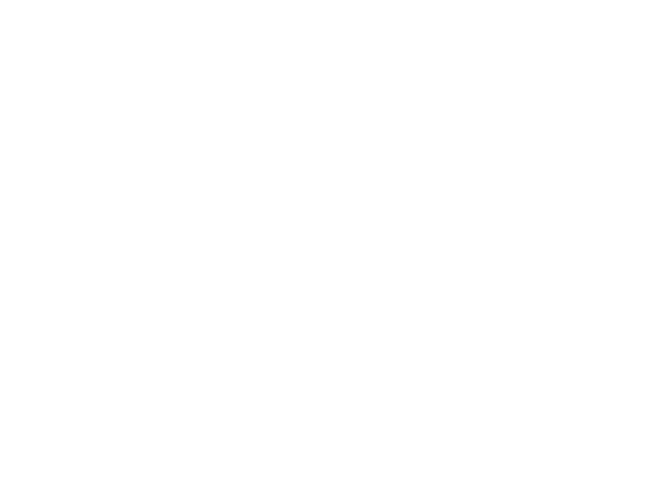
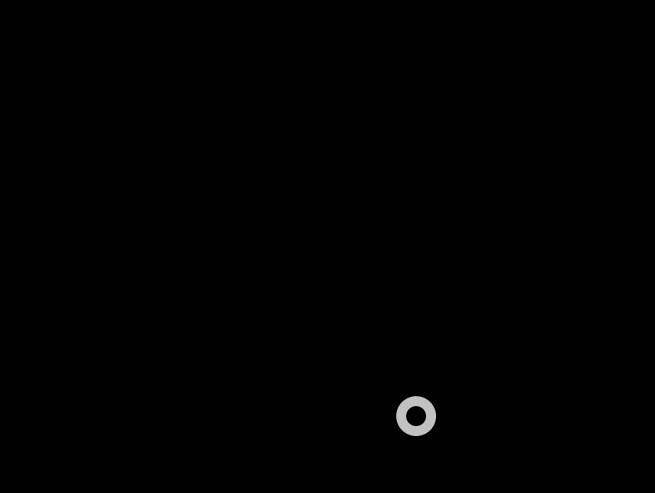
via: none -> (416, 416)

